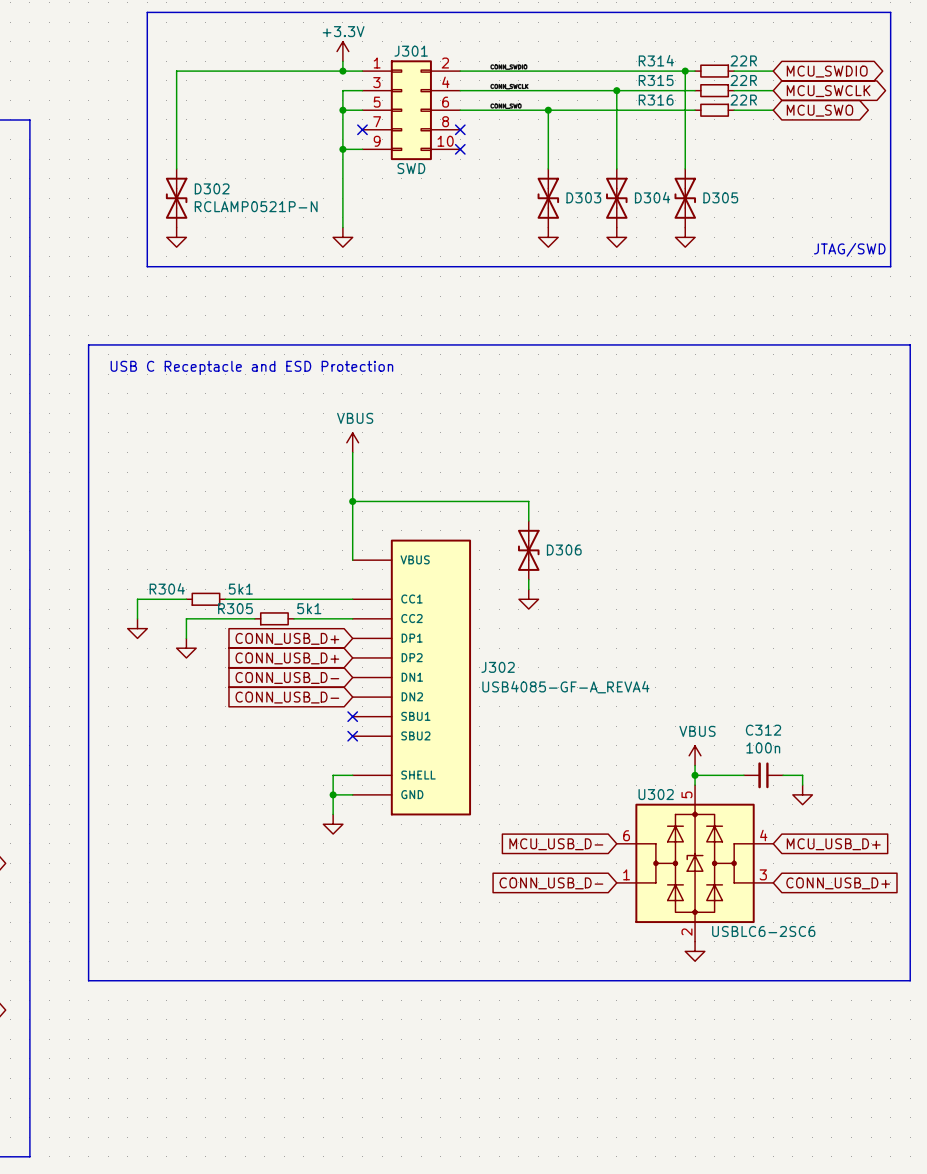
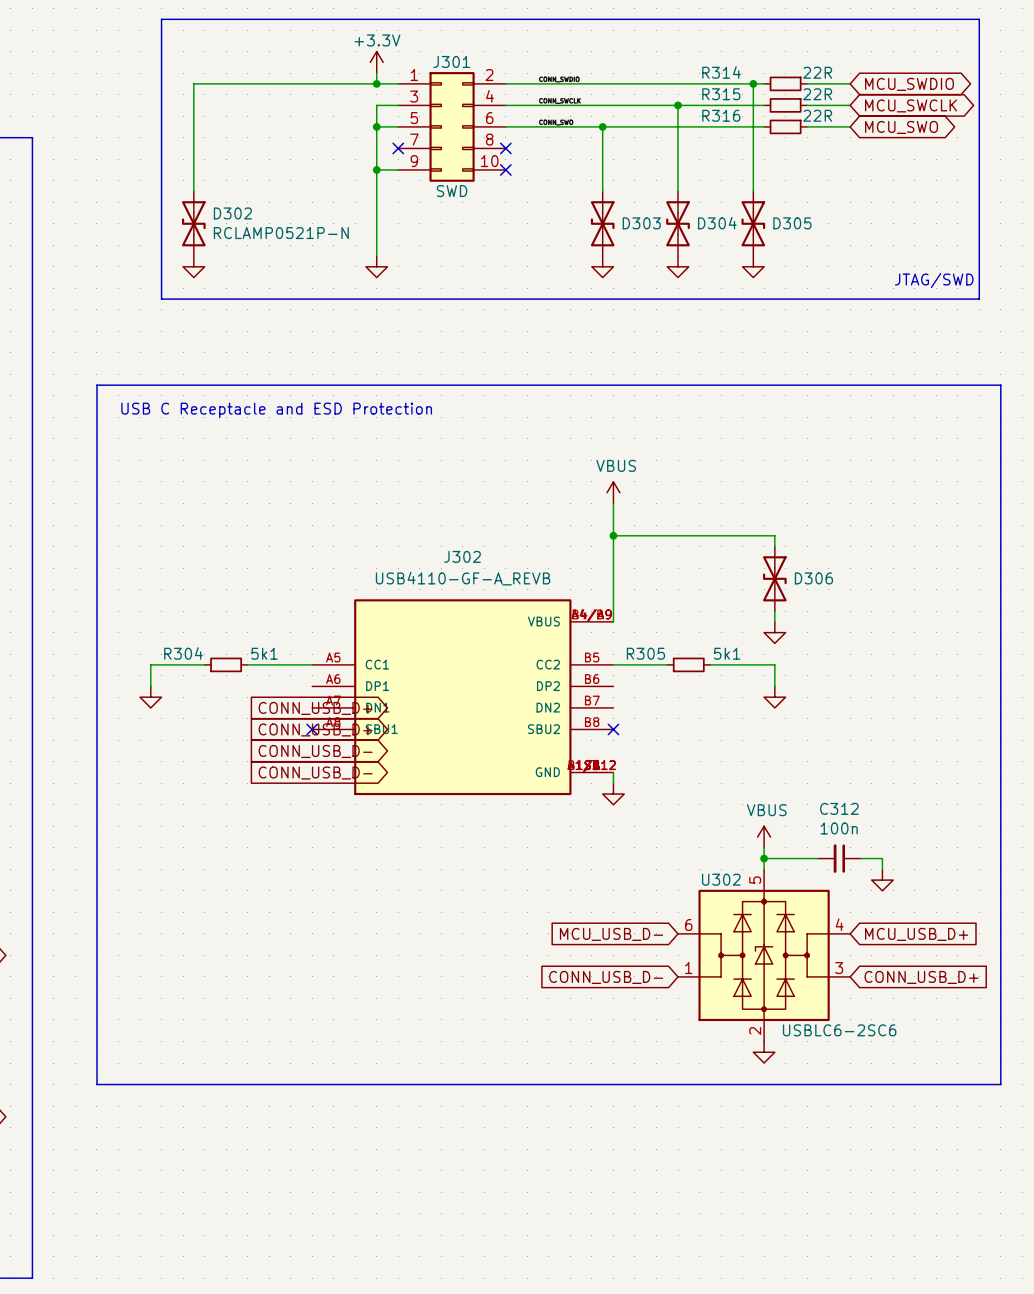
power symbol: VBUS (352, 442) -> none
power symbol: none -> VBUS (613, 492)
wire: (352, 452) (352, 560) -> none
wire: none -> (613, 503) (613, 621)
wire: none -> (613, 535) (774, 535) (774, 546)
junction: none -> (613, 535)
wire: (352, 501) (528, 501) (528, 521) -> none
junction: (352, 501) -> none
J302 symbol: [352, 539, 472, 816] -> [312, 599, 614, 796]
D306 position: (528, 550) -> (774, 578)
wire: none -> (774, 611) (774, 621)
power symbol: none -> (774, 632)
wire: (528, 579) (528, 589) -> (613, 772) (613, 783)
power symbol: (528, 599) -> none
wire: none -> (613, 664) (667, 664)
wire: none -> (710, 664) (774, 664) (774, 686)
wire: (254, 618) (186, 618) (186, 638) -> none
R305 position: (274, 618) -> (688, 664)
power symbol: none -> (774, 697)
power symbol: (186, 648) -> none
no-connect mark: none -> (312, 729)
no-connect mark: none -> (613, 729)
J302 name position: J302 (498, 667) -> J302 (462, 556)
J302 value: USB4085-GF-A_REVA4 (565, 687) -> USB4110-GF-A_REVB (463, 578)
no-connect mark: (352, 716) -> none
power symbol: none -> (613, 794)
no-connect mark: (352, 736) -> none
wire: (352, 775) (333, 775) (333, 814) -> none
wire: (333, 794) (352, 794) -> none
junction: (333, 794) -> none
power symbol: (333, 824) -> none

